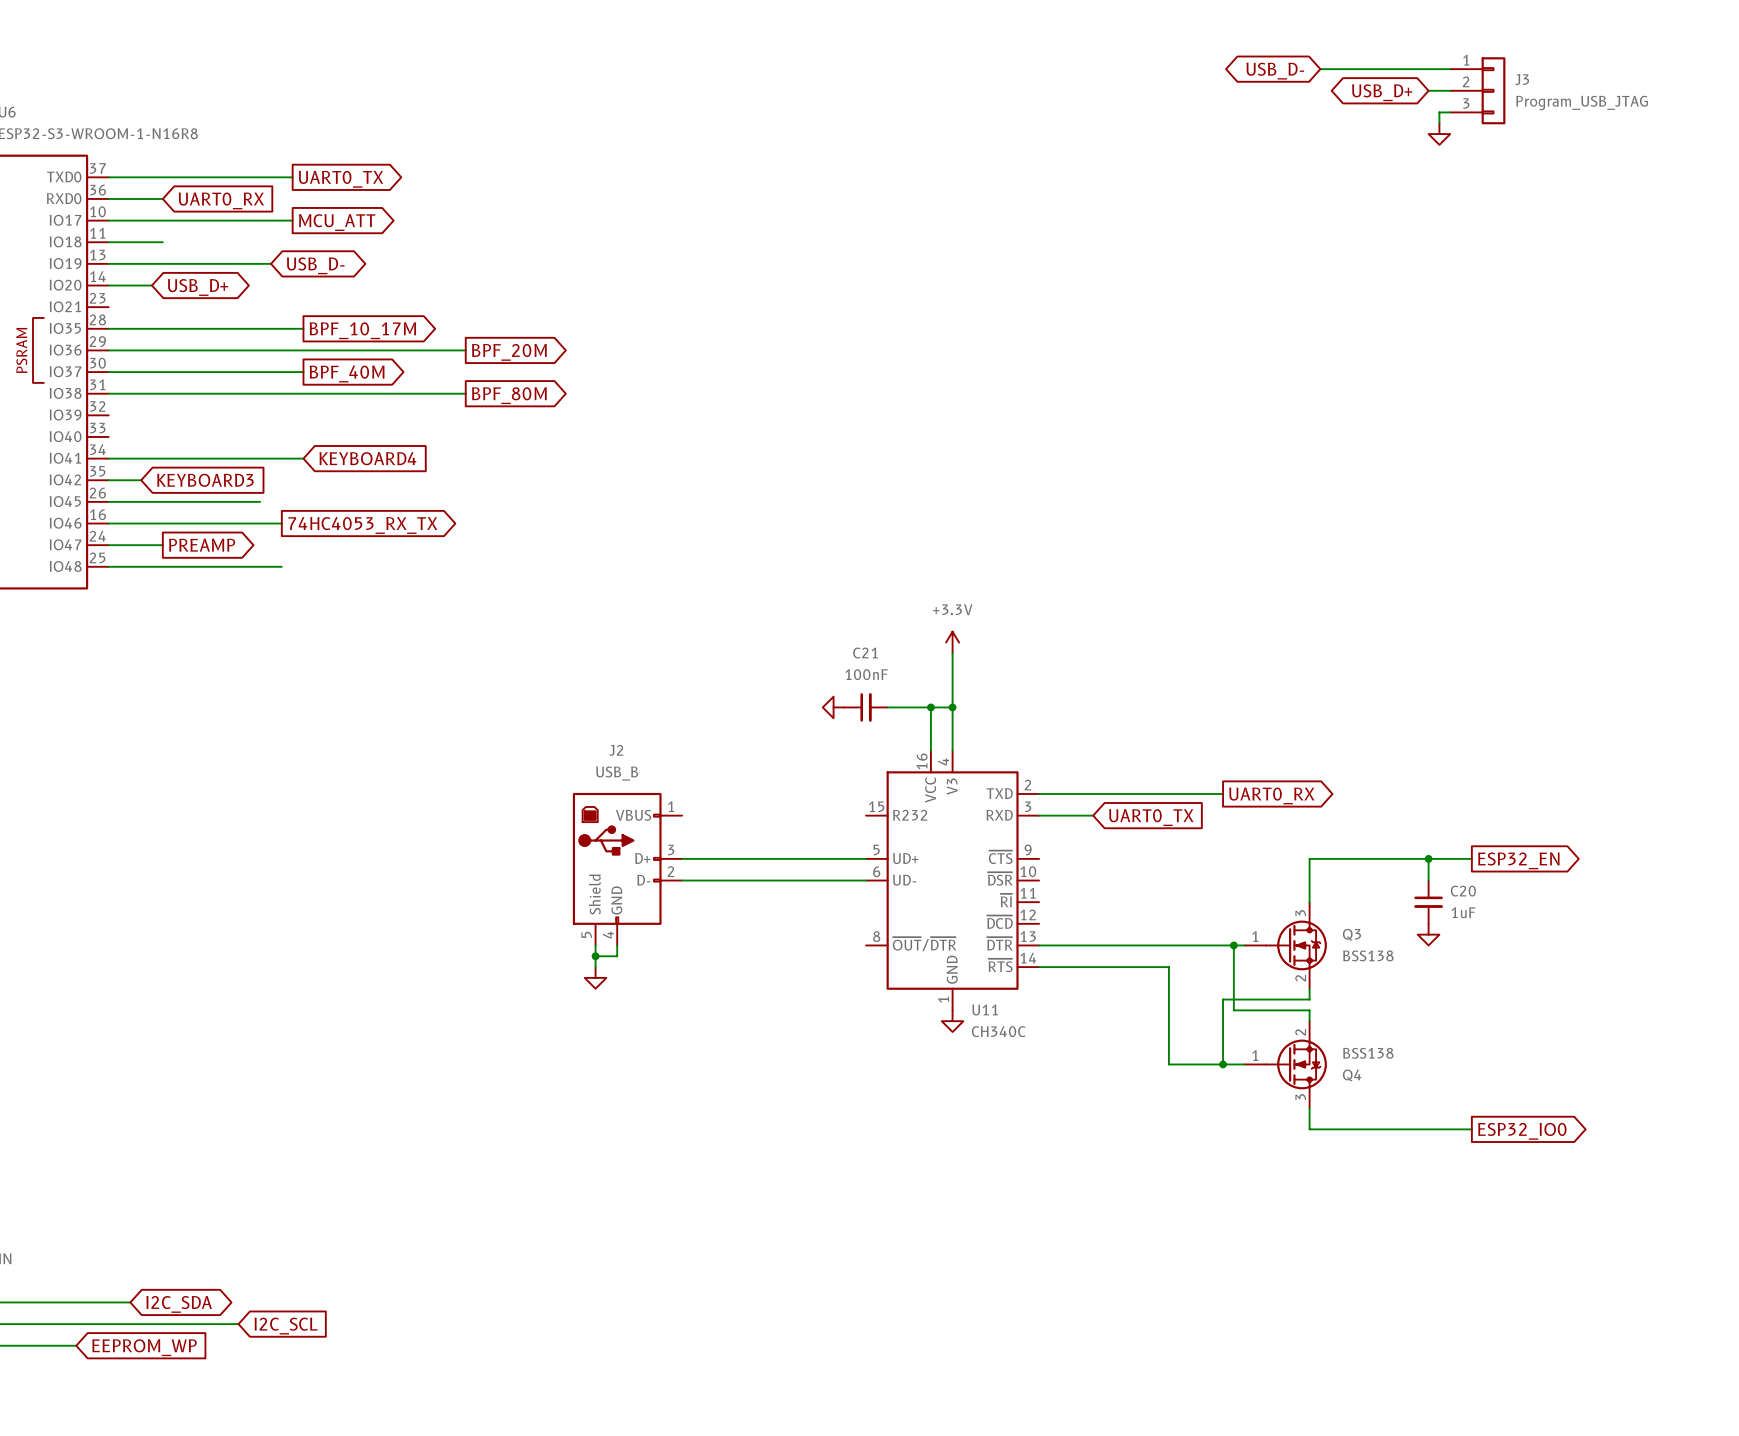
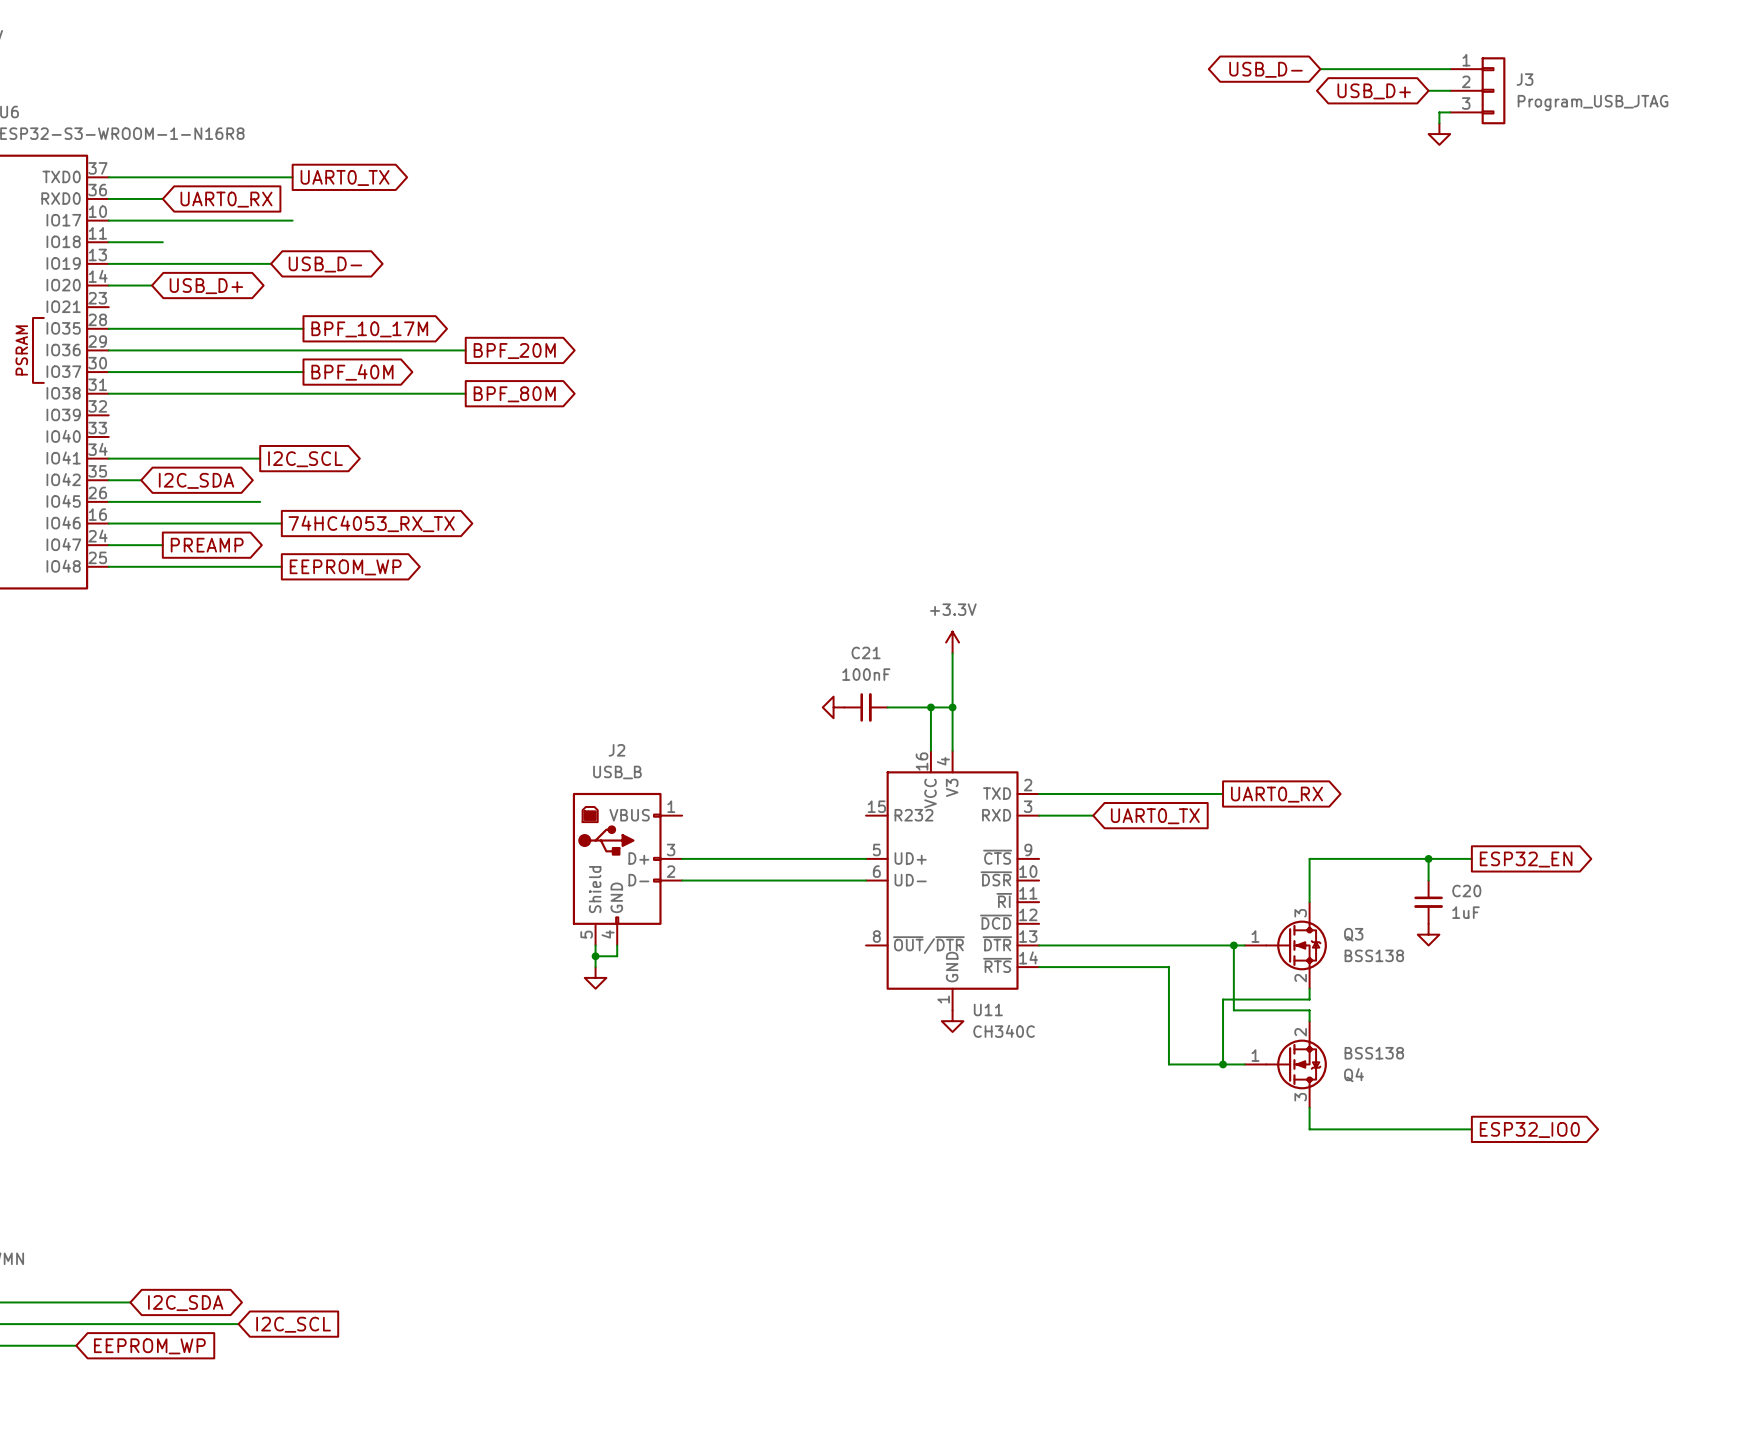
global label: MCU_ATT (337, 222) -> none
wire: (260, 458) (303, 458) -> none
global label: KEYBOARD4 (367, 458) -> none
global label: none -> I2C_SCL (305, 459)
global label shape: input (205, 480) -> bidirectional (196, 480)
global label: KEYBOARD3 (205, 480) -> I2C_SDA (196, 480)
global label: none -> EEPROM_WP (345, 567)

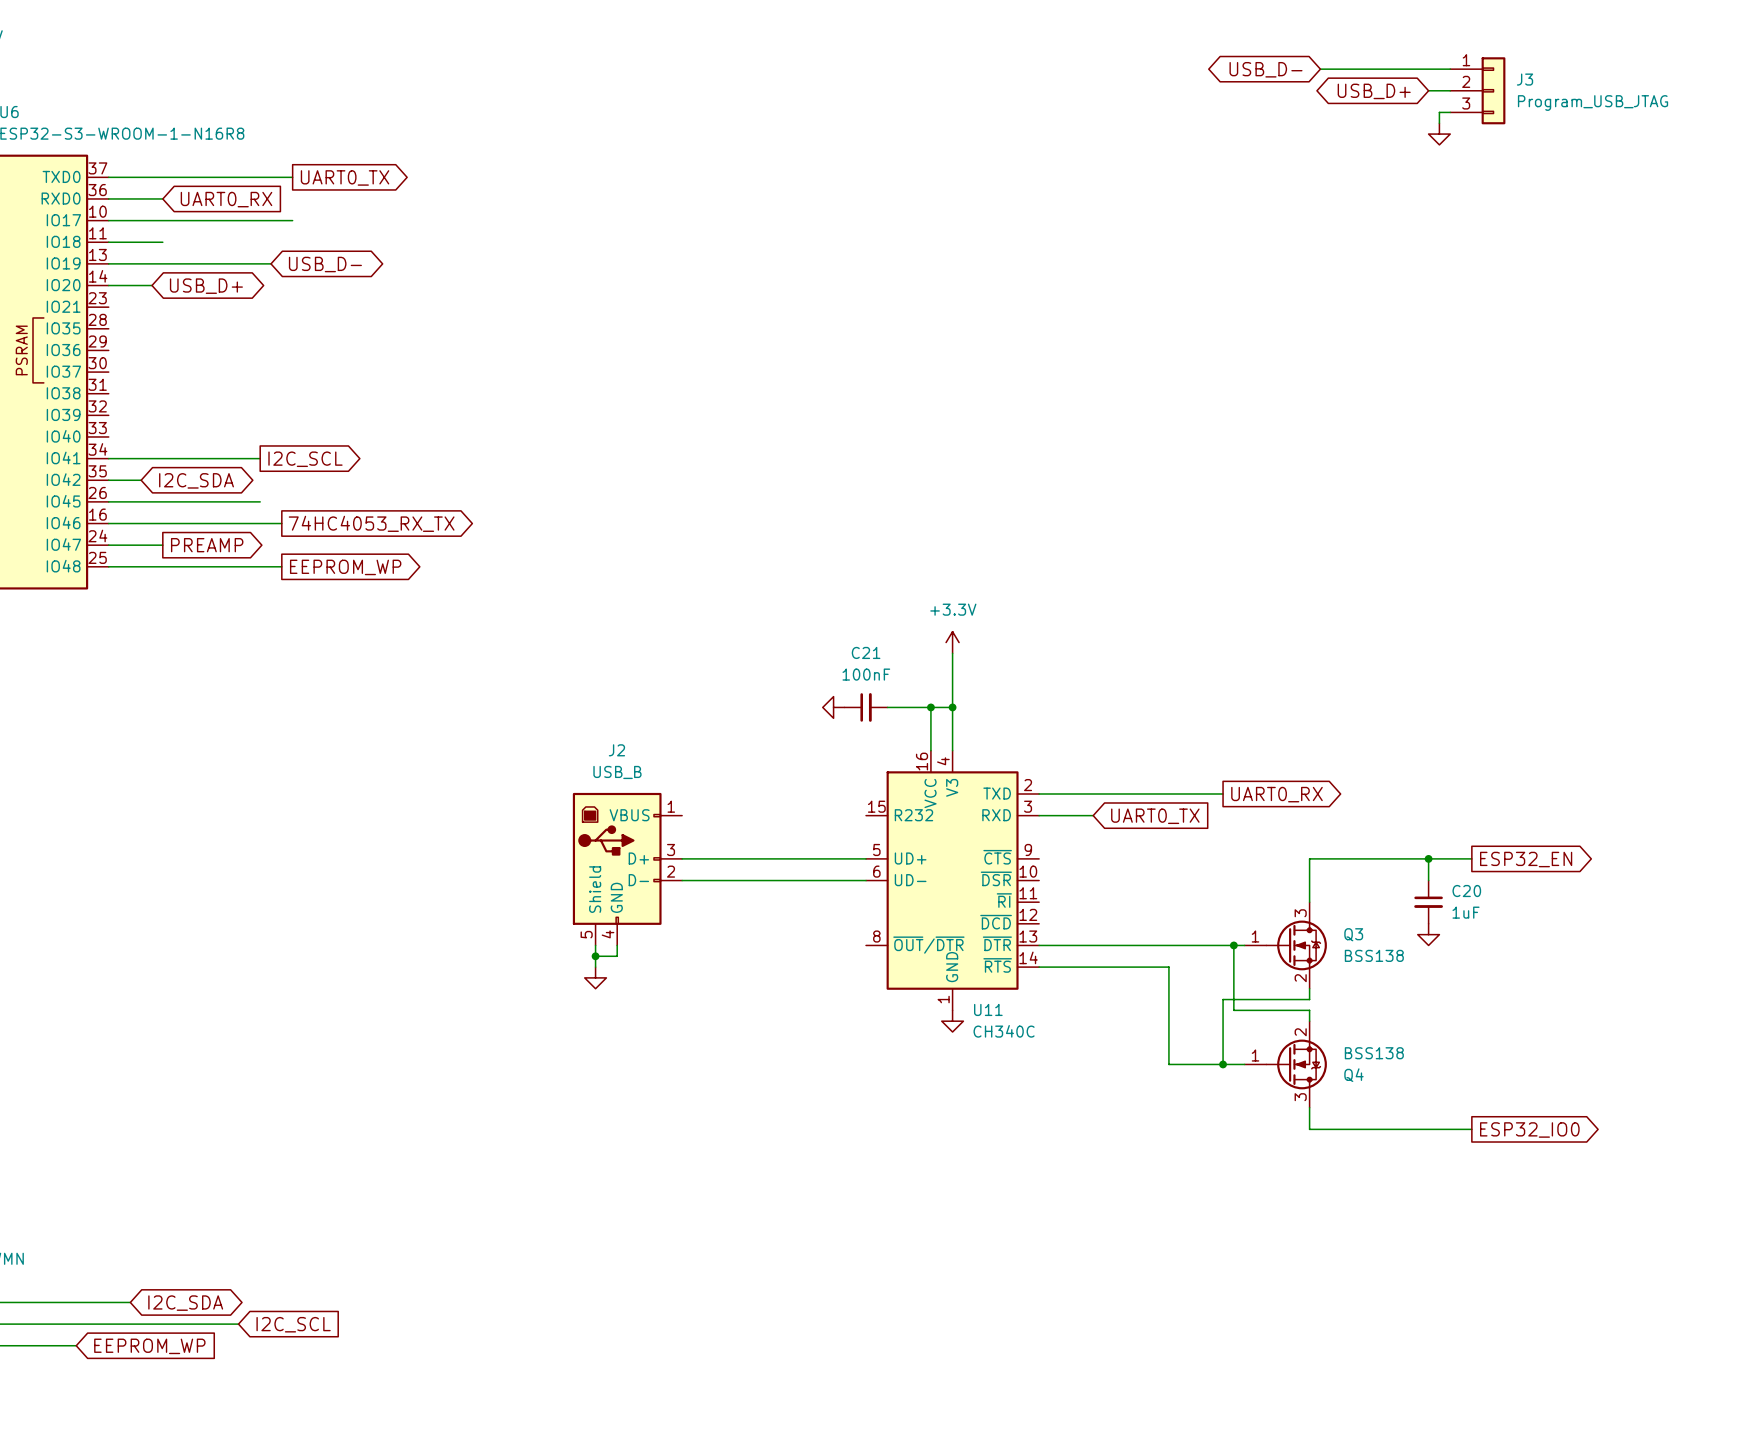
wire: (108, 328) (303, 328) -> none
global label: BPF_10_17M (369, 329) -> none
wire: (108, 350) (465, 350) -> none
global label: BPF_20M (514, 351) -> none
wire: (108, 372) (303, 372) -> none
global label: BPF_40M (352, 372) -> none
wire: (108, 393) (465, 393) -> none
global label: BPF_80M (514, 394) -> none

